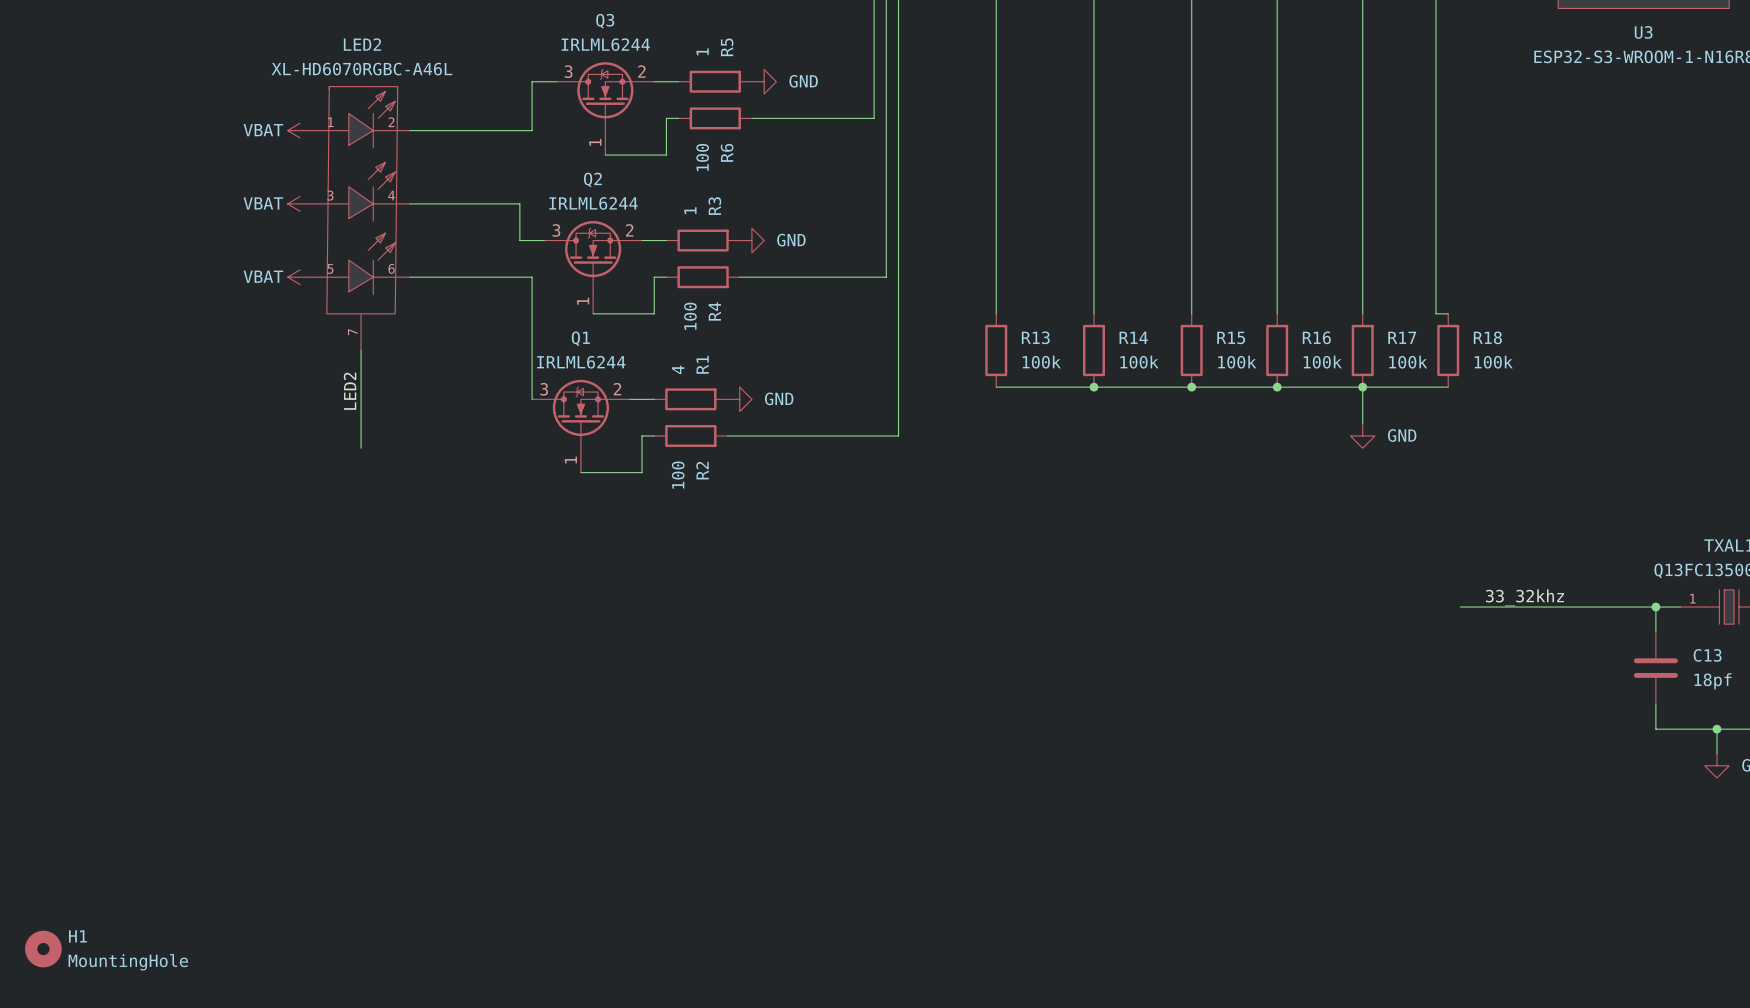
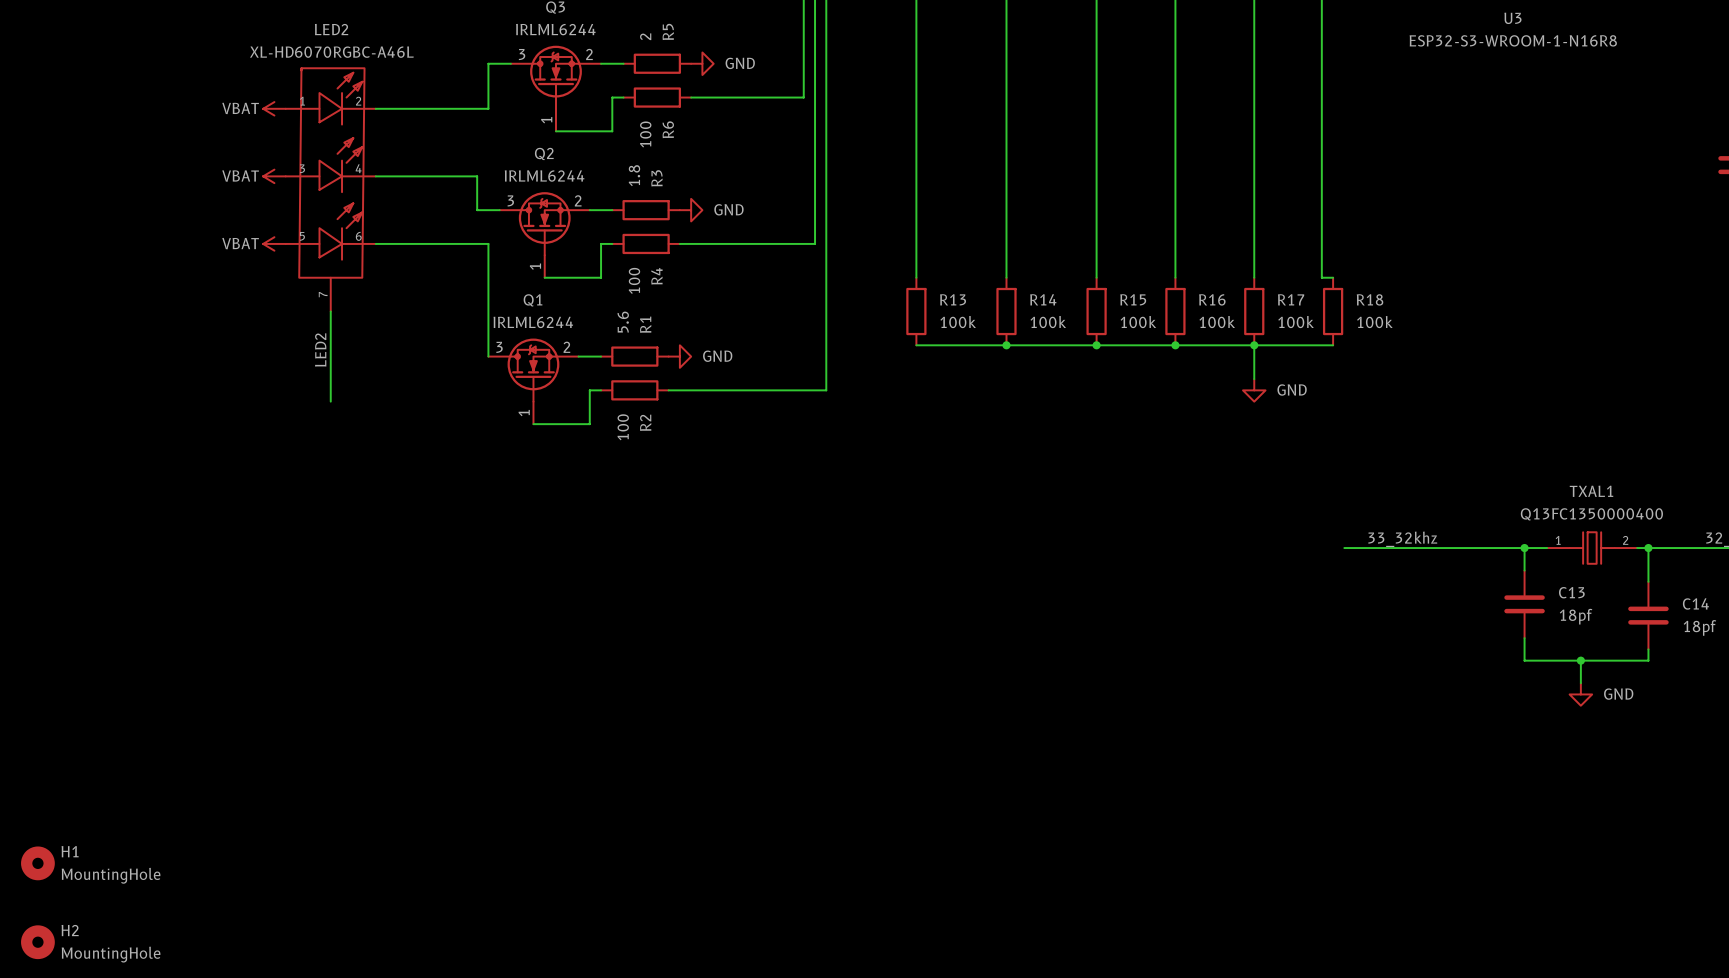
R5 value: 1 (702, 51) -> 2 (645, 36)
R3 value: 1 (690, 210) -> 1.8 (634, 175)
R1 value: 4 (678, 369) -> 5.6 (623, 322)

